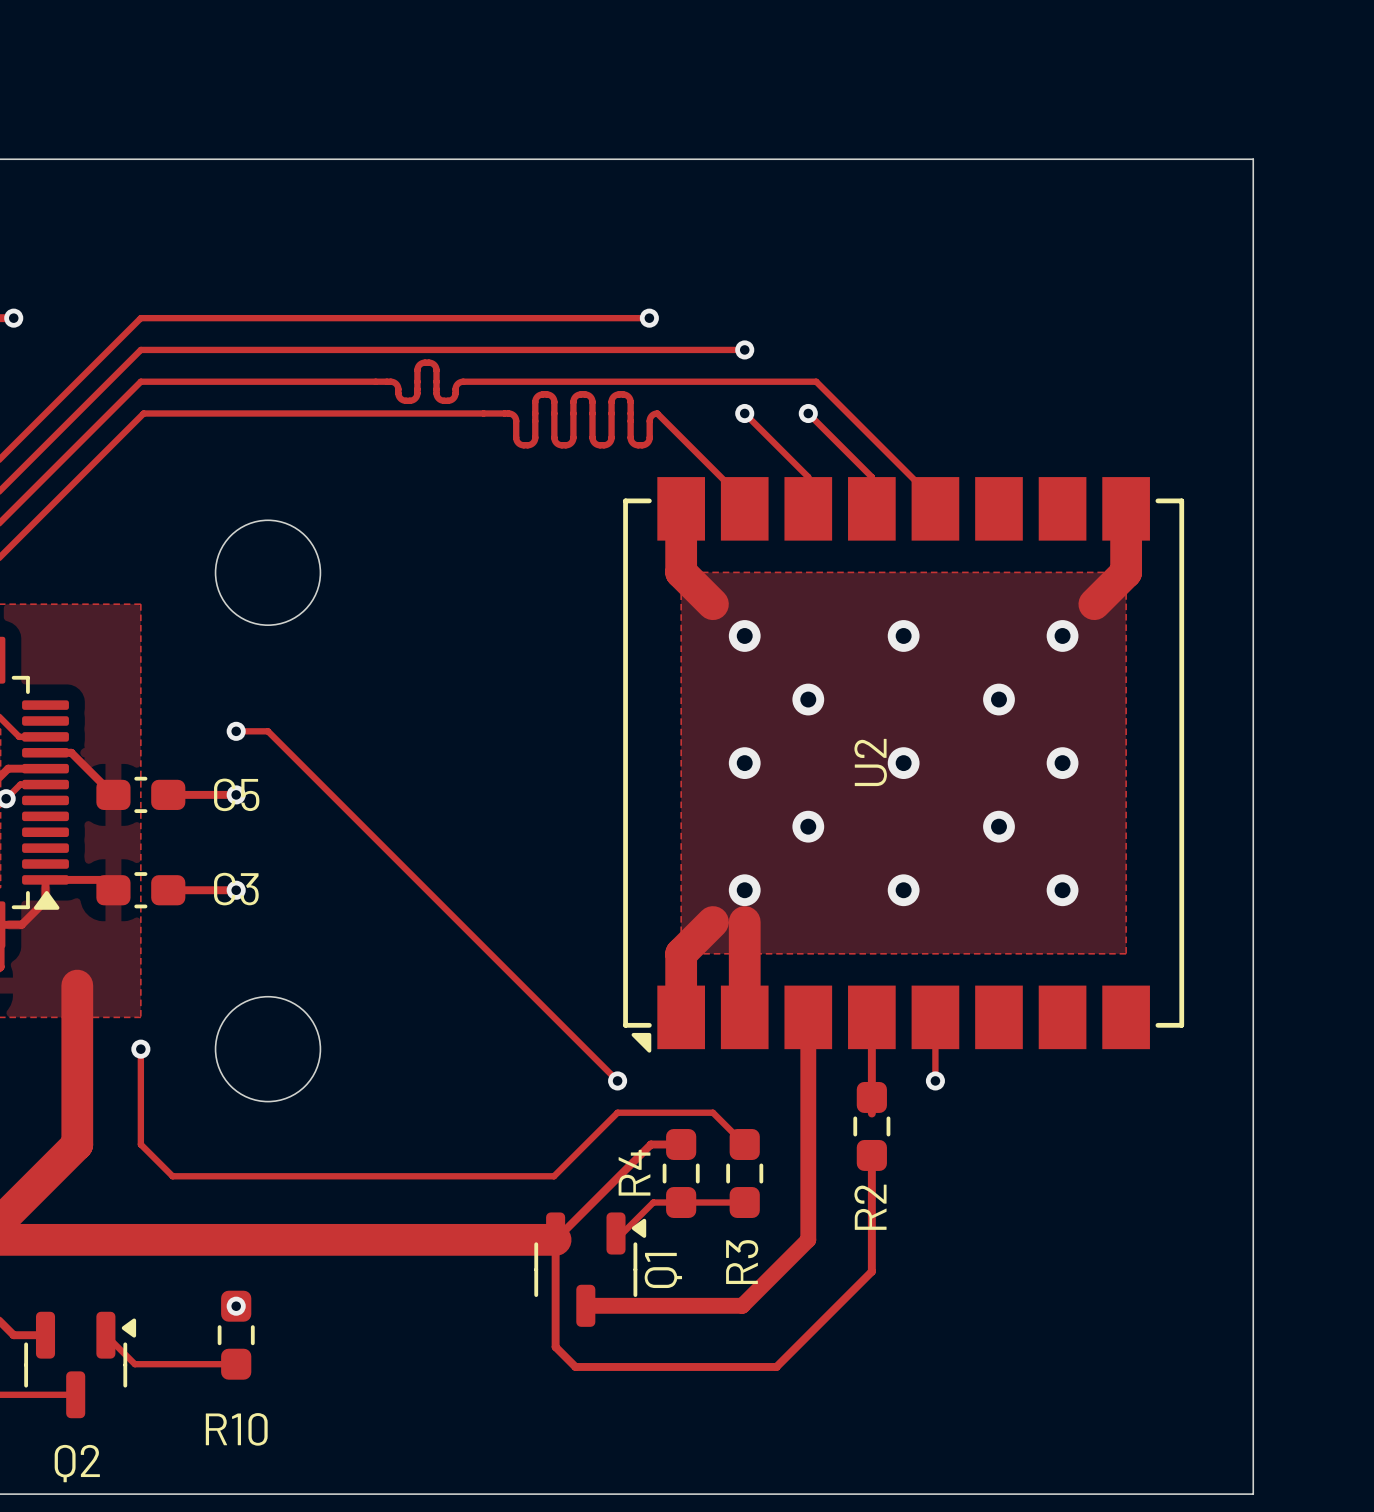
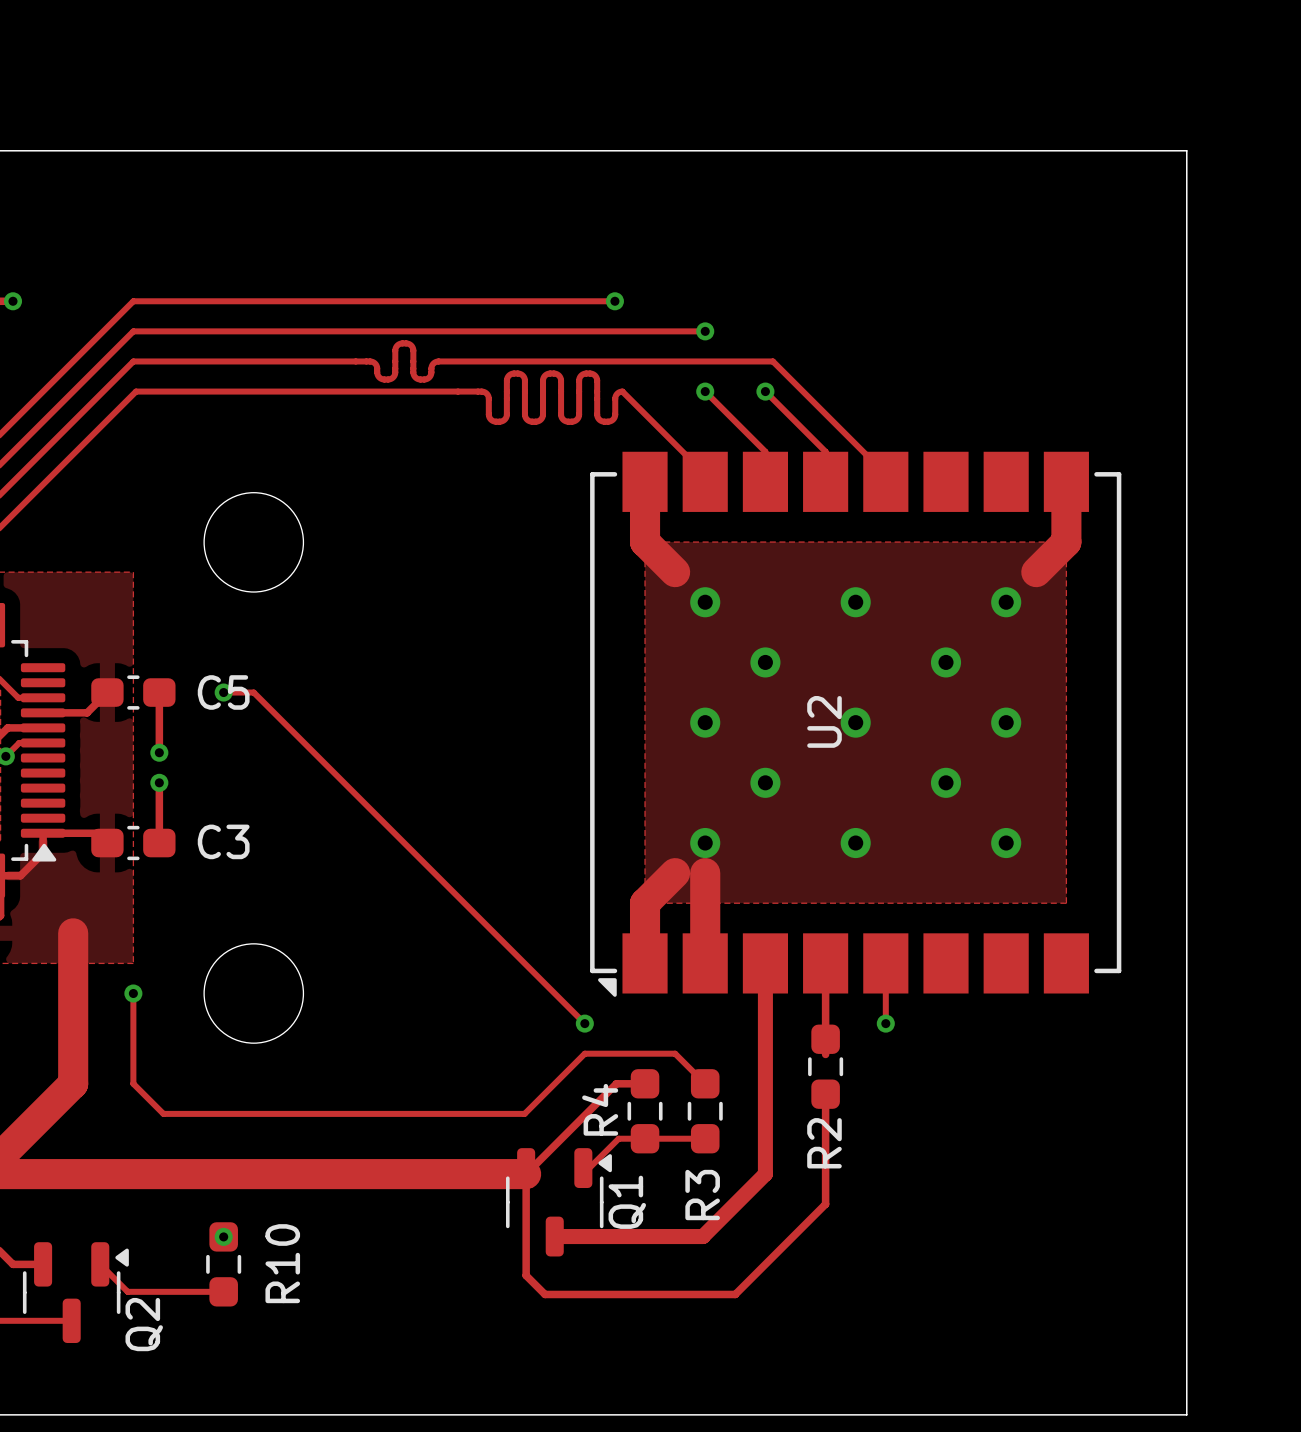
track: (71, 752) (113, 794) -> (67, 712) (87, 712) (107, 692)
C5 position: (140, 794) -> (133, 692)
track: (168, 794) (236, 794) -> (159, 752) (159, 692)
via: none -> (159, 752)
via: (236, 794) -> none
via: none -> (159, 782)
track: (168, 890) (236, 890) -> (159, 843) (159, 782)
via: (236, 890) -> none
R10 name rotation: 0° (236, 1429) -> 90° counterclockwise (282, 1263)
R10 name position: R10 (236, 1429) -> R10 (282, 1263)
Q2 name rotation: 0° (77, 1463) -> 90° counterclockwise (144, 1324)
Q2 name position: Q2 (77, 1463) -> Q2 (144, 1324)

